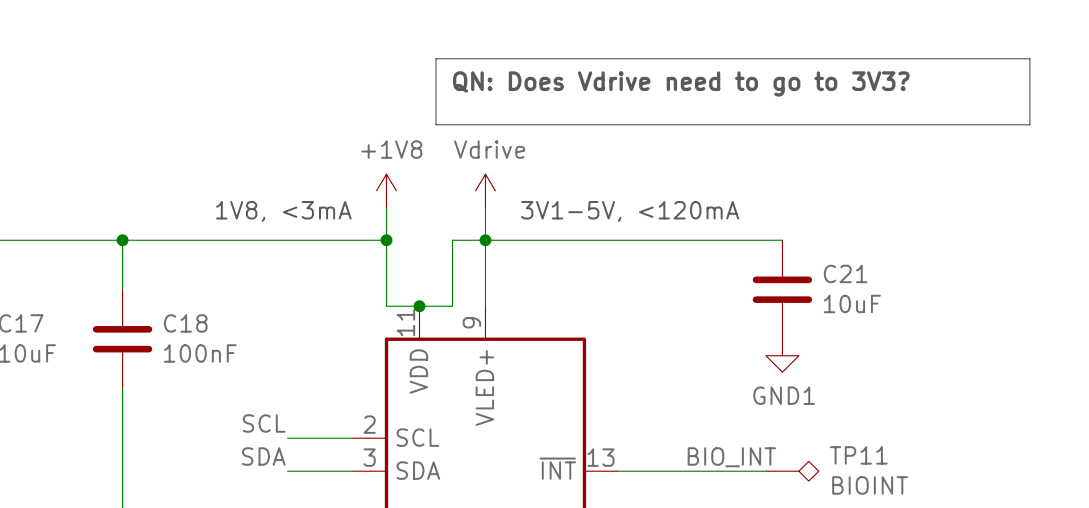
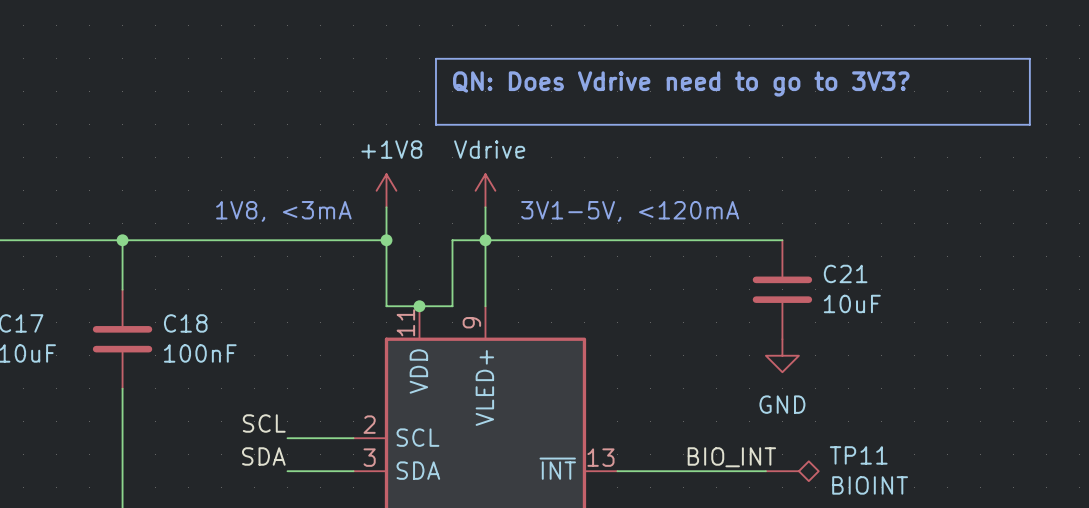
power symbol: GND1 (782, 355) -> GND (782, 355)

